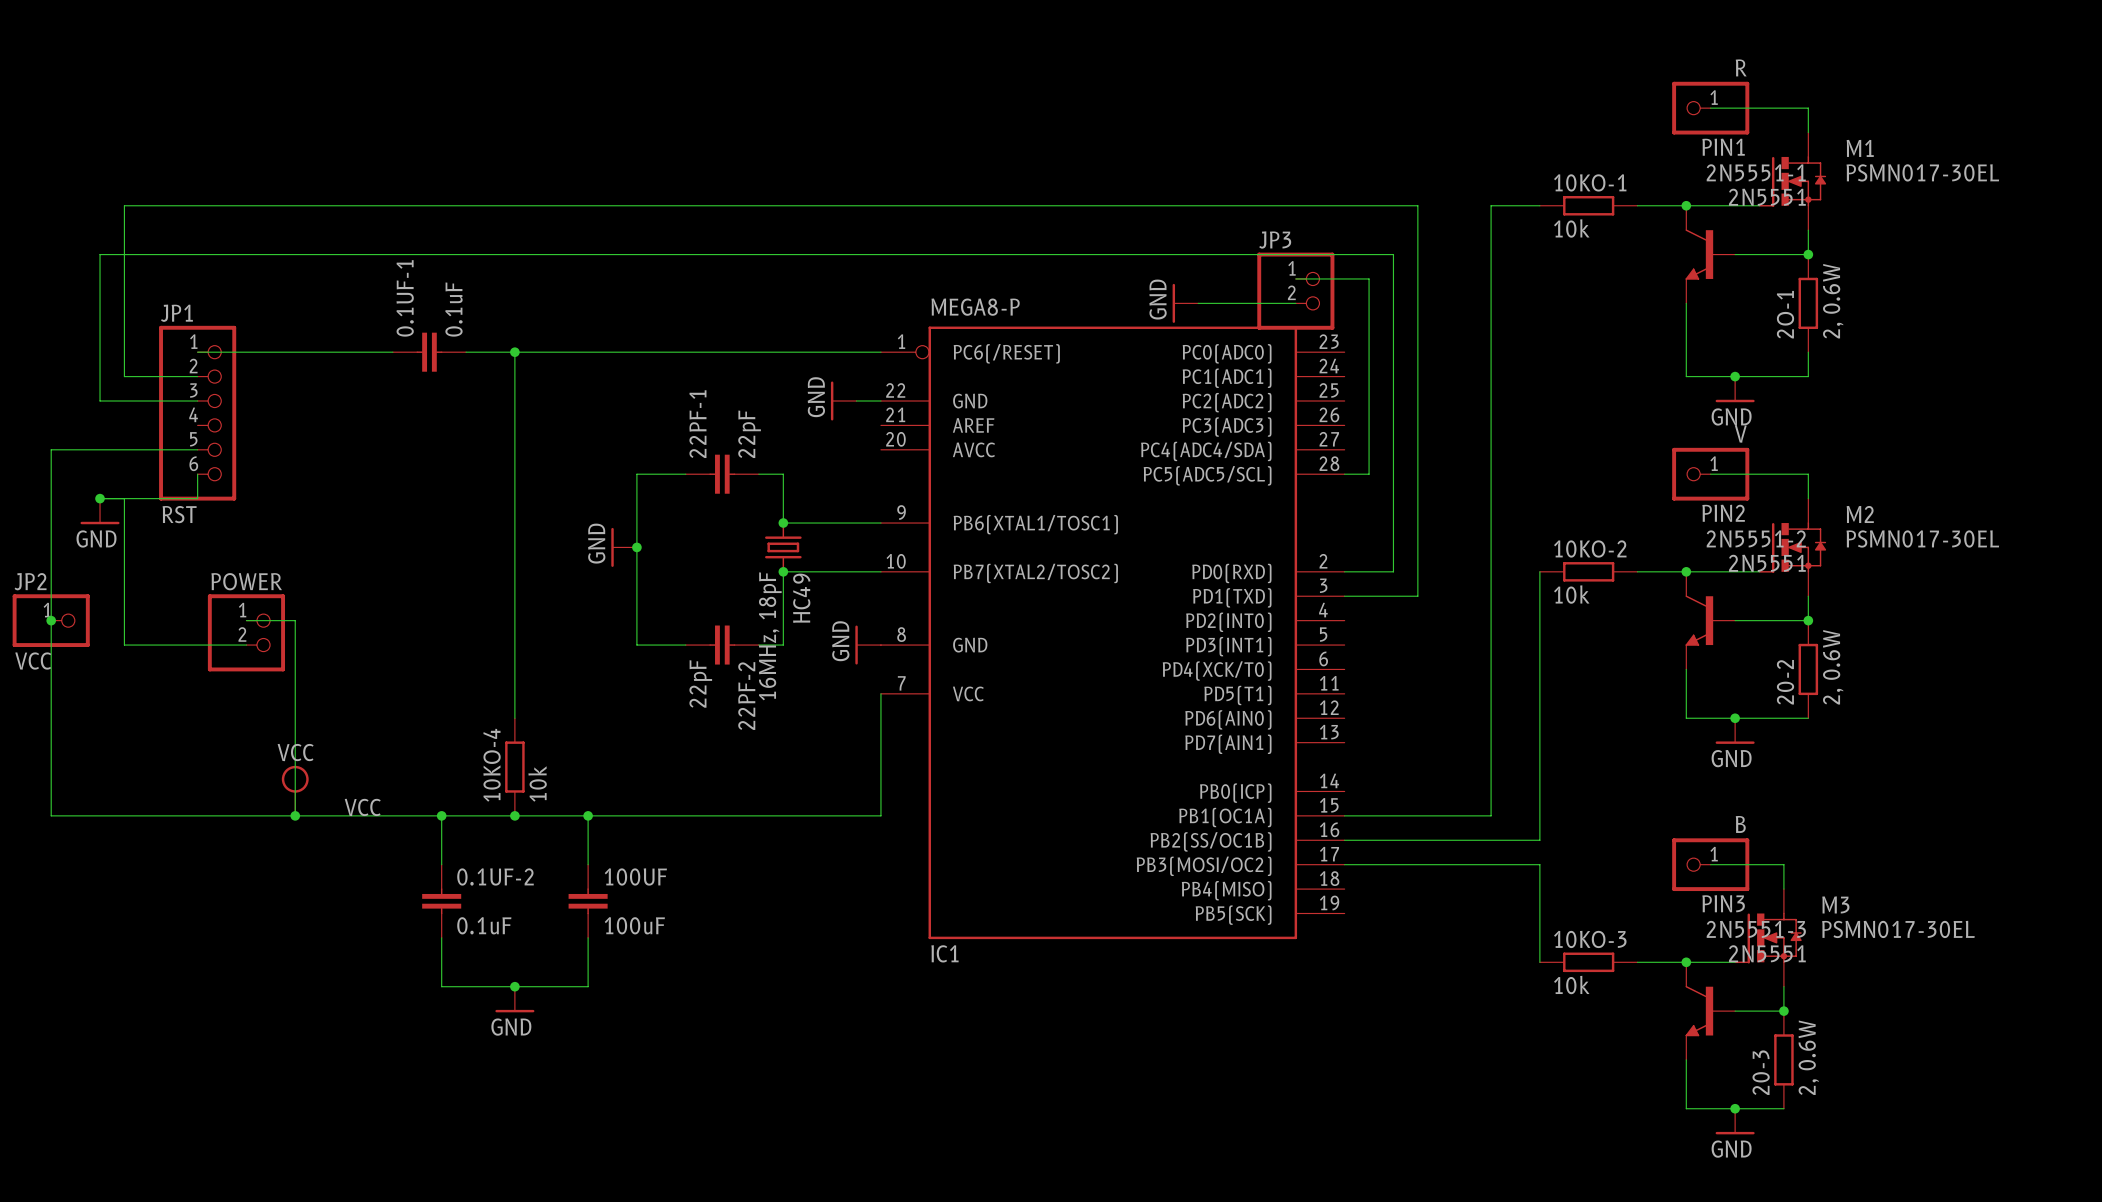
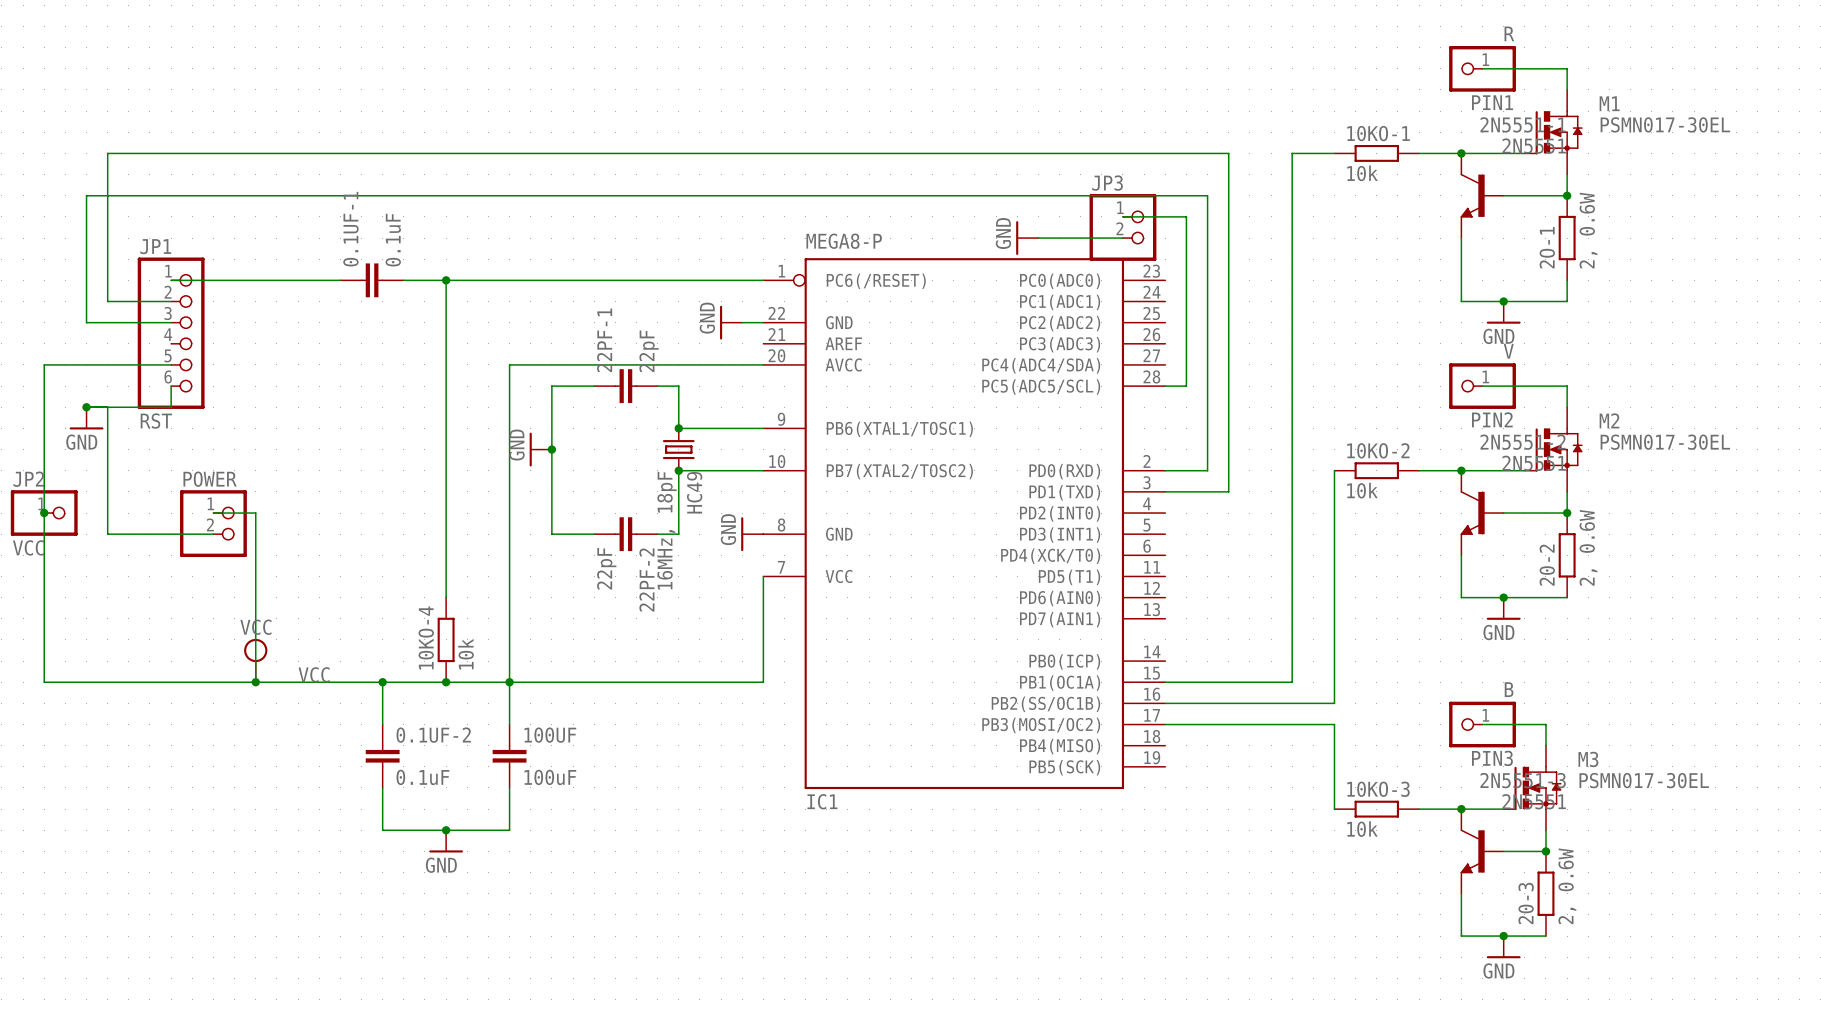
wire: none -> (763, 364) (509, 364) (509, 682)

